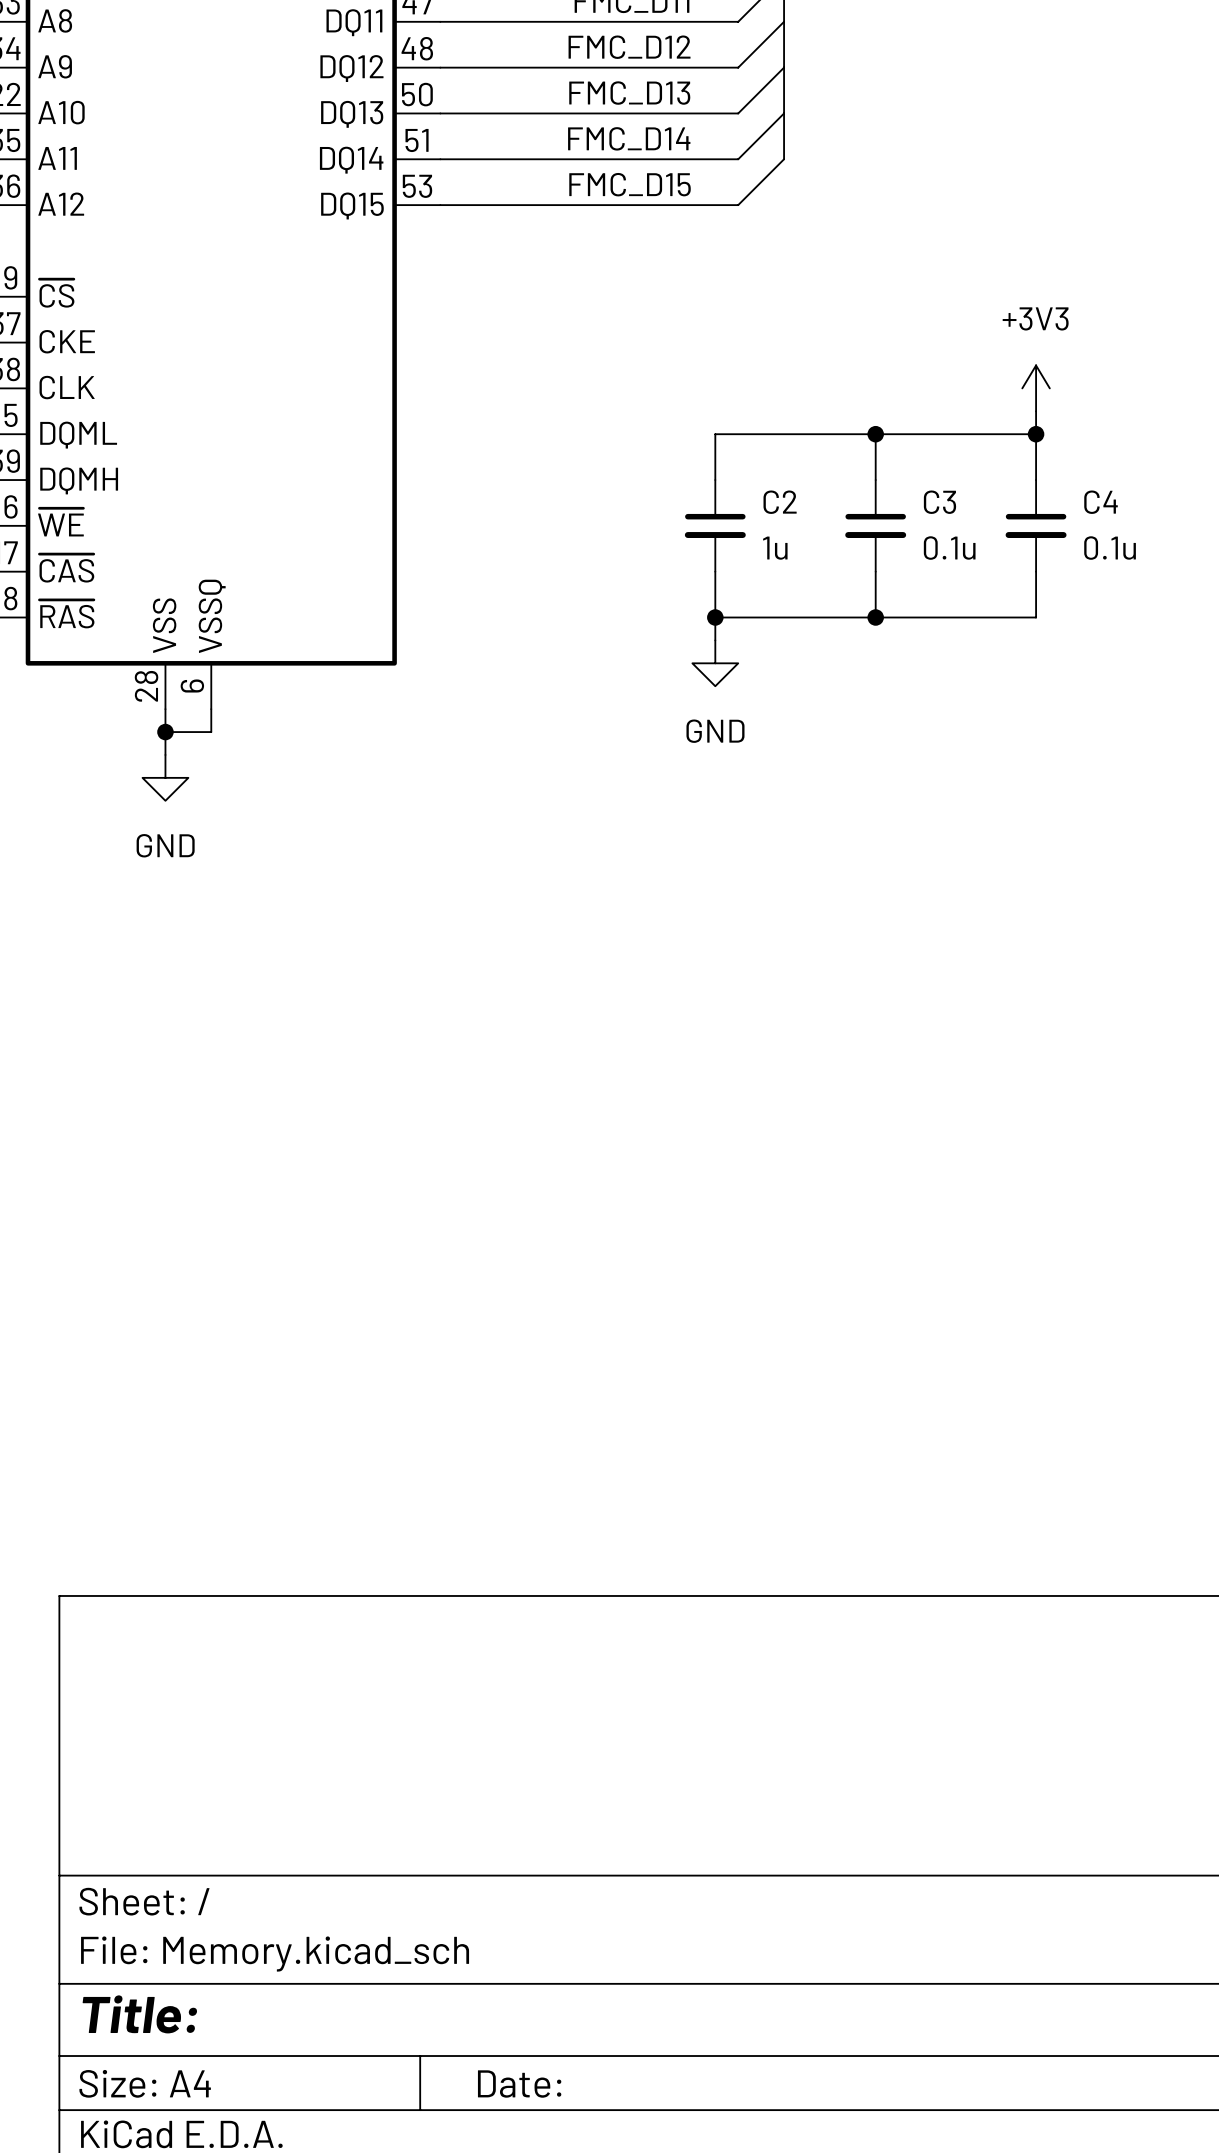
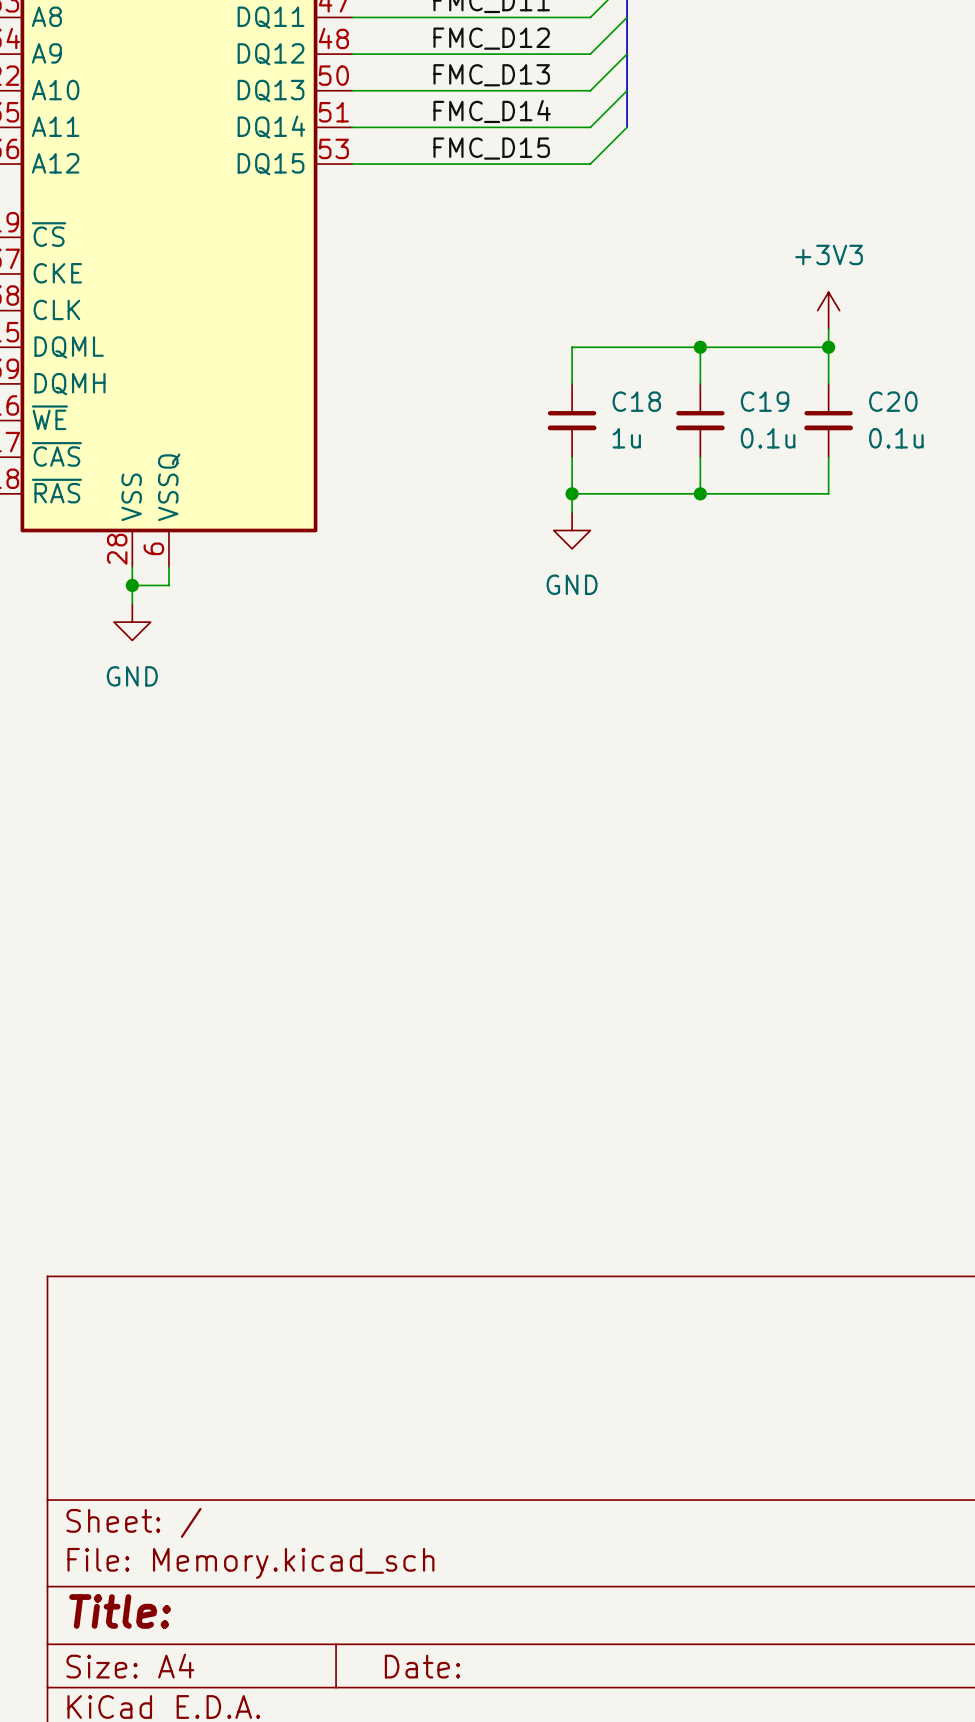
C2 name: C2 (780, 502) -> C18 (636, 401)
C3 name: C3 (939, 502) -> C19 (765, 401)
C4 name: C4 (1101, 502) -> C20 (893, 401)

